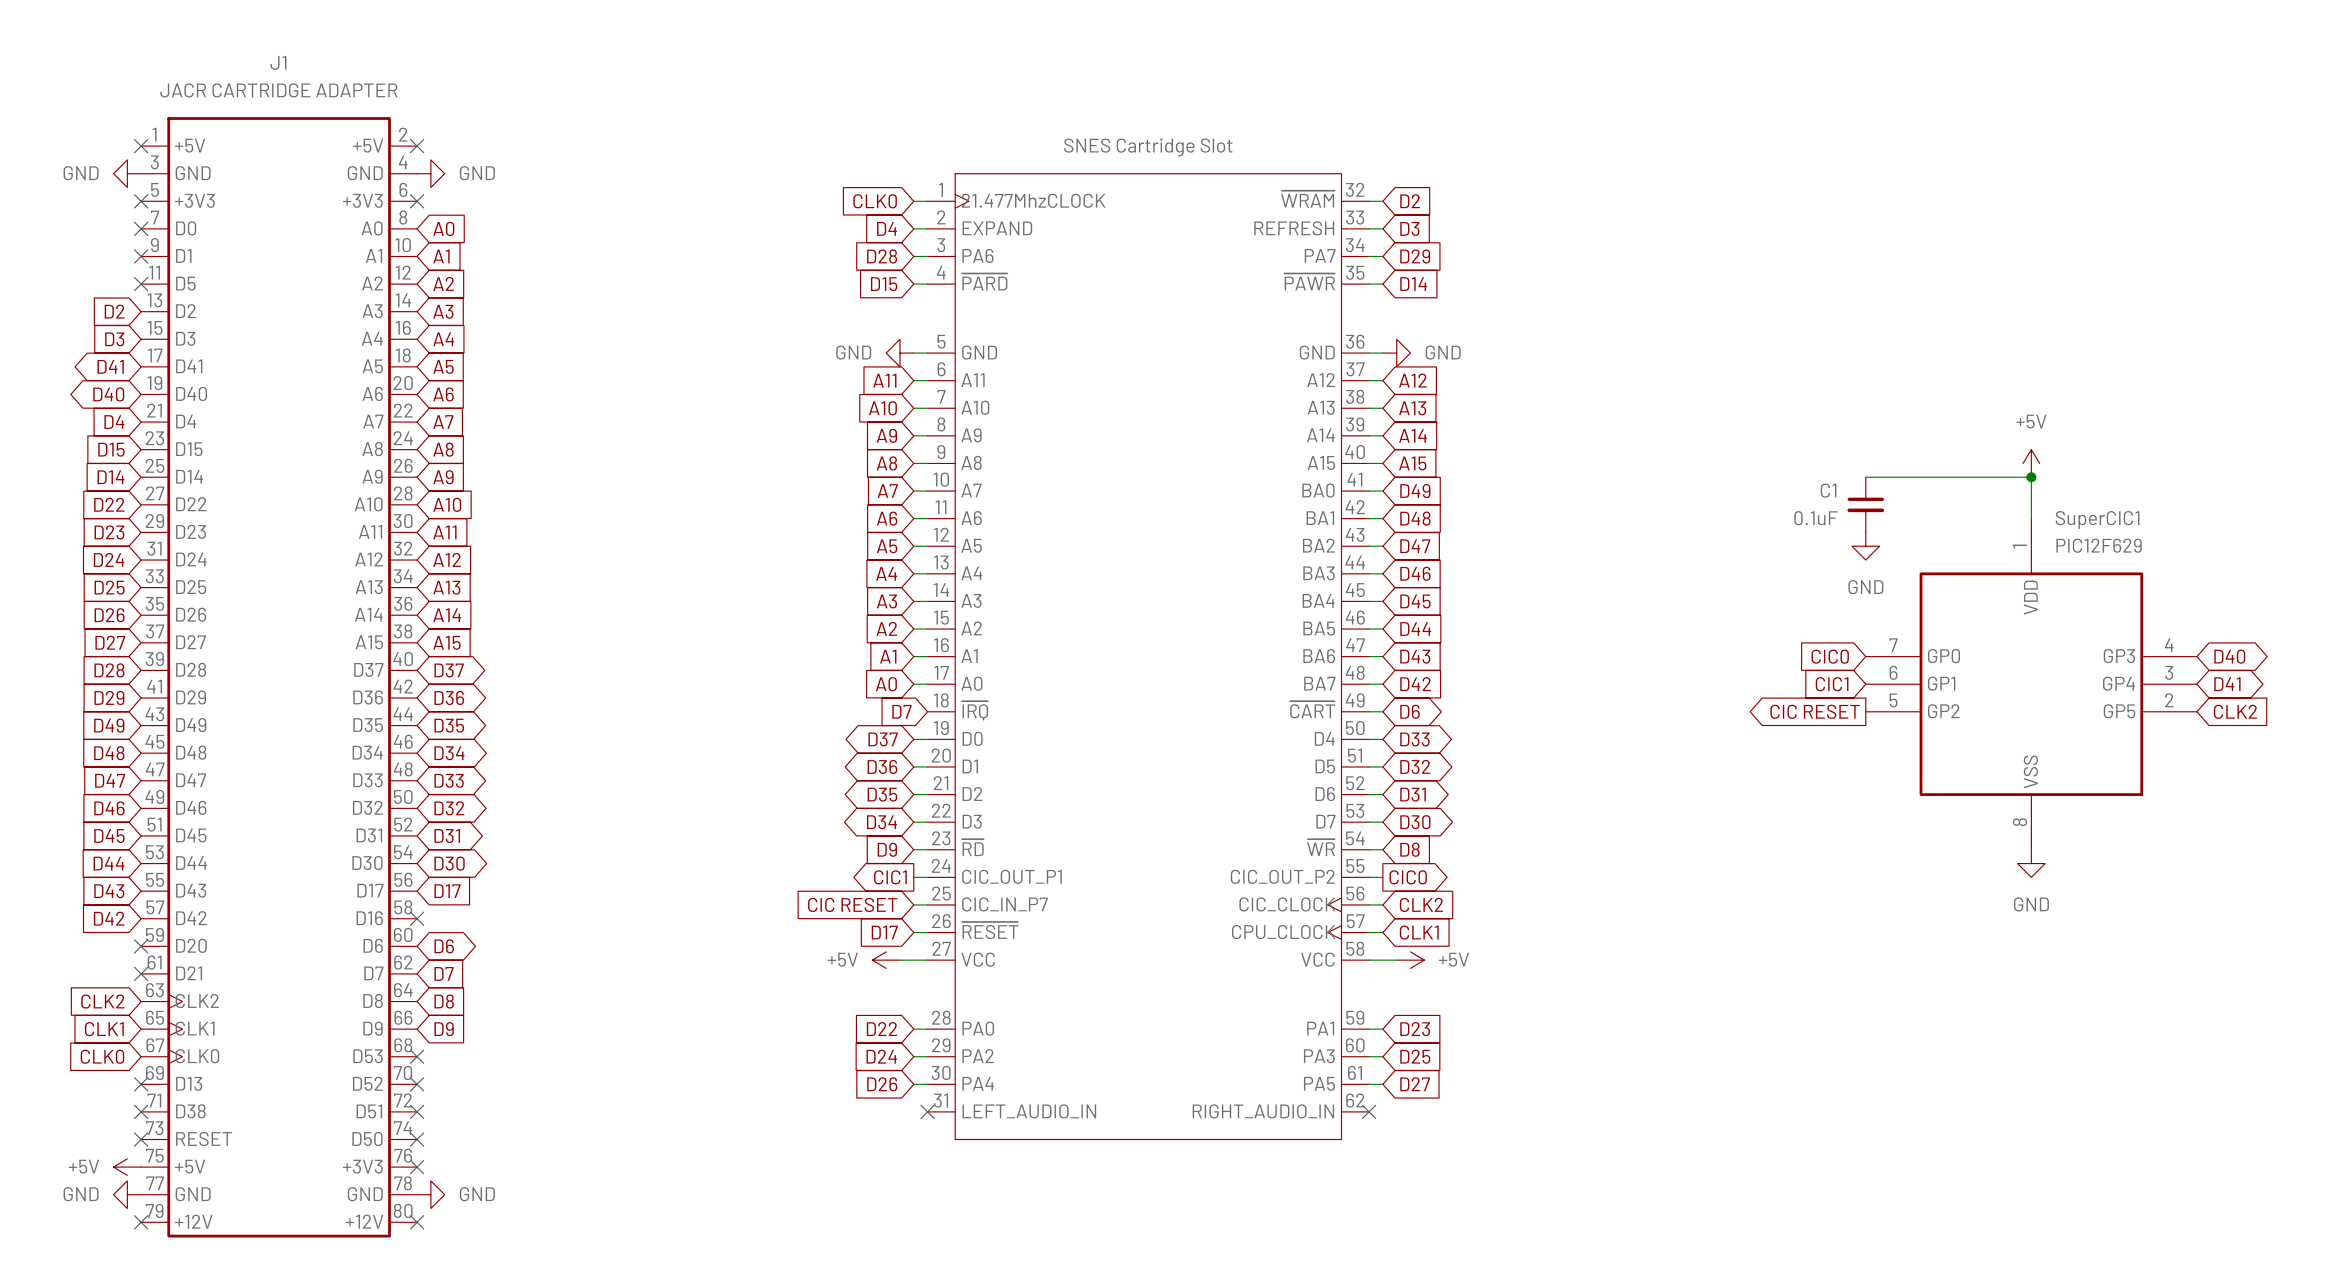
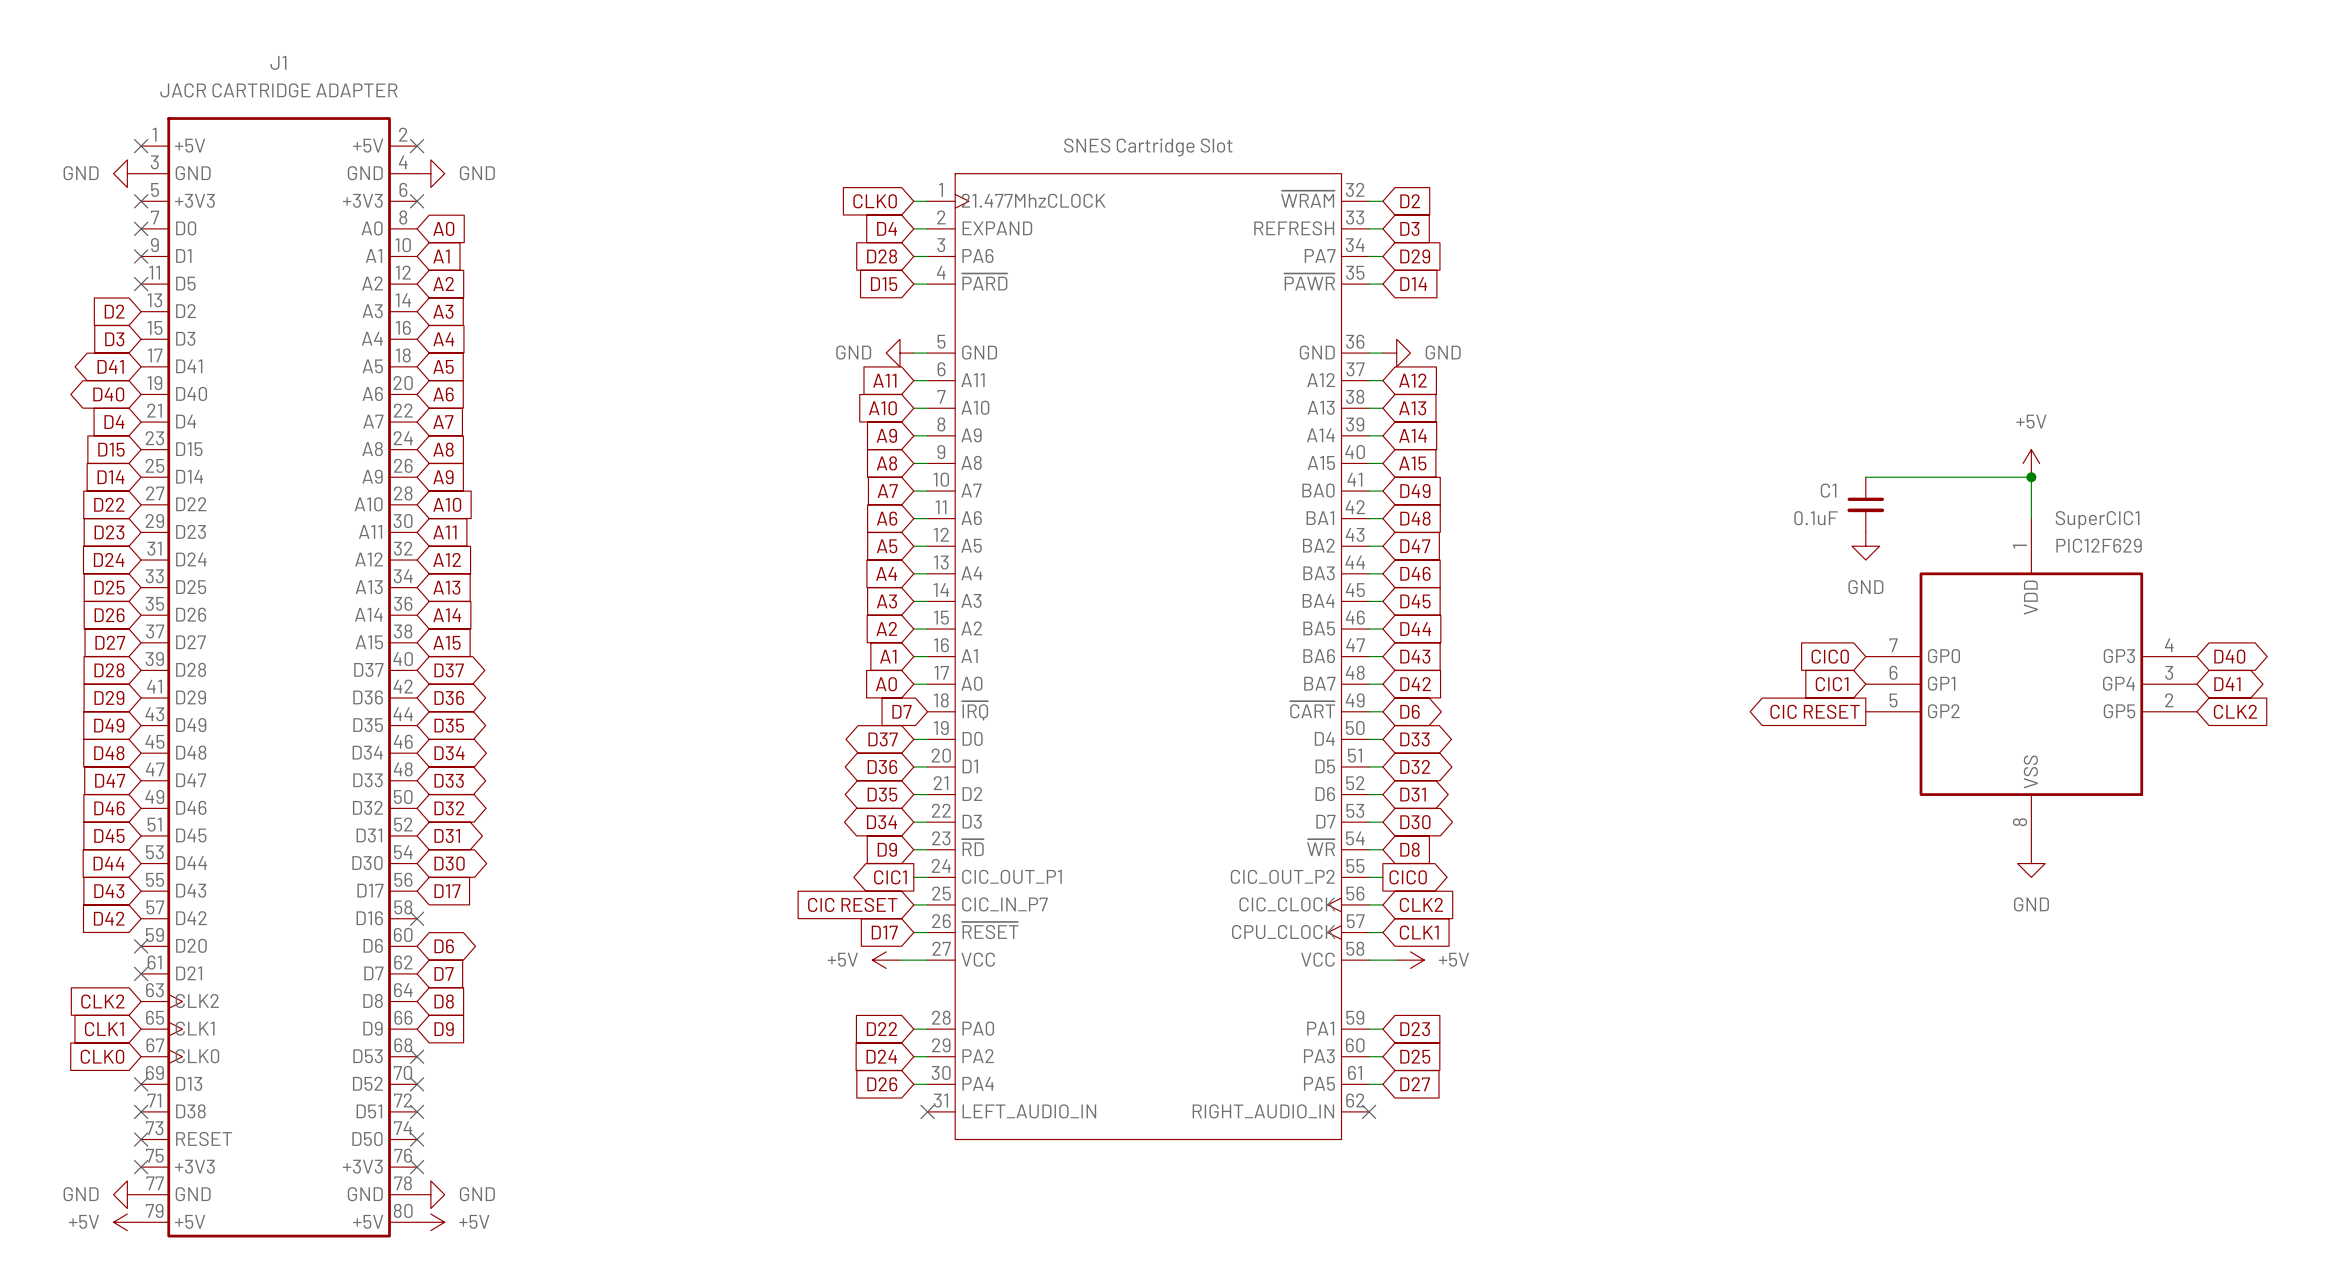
J1 pin name: +5V (190, 1166) -> +3V3 (194, 1166)
power symbol position: +5V (127, 1167) -> +5V (127, 1222)
J1 pin name: +12V (193, 1221) -> +5V (190, 1221)
J1 pin name: +12V (364, 1221) -> +5V (368, 1221)
no-connect mark position: (141, 1222) -> (141, 1167)
no-connect mark: (417, 1222) -> none
power symbol: none -> +5V (430, 1222)

